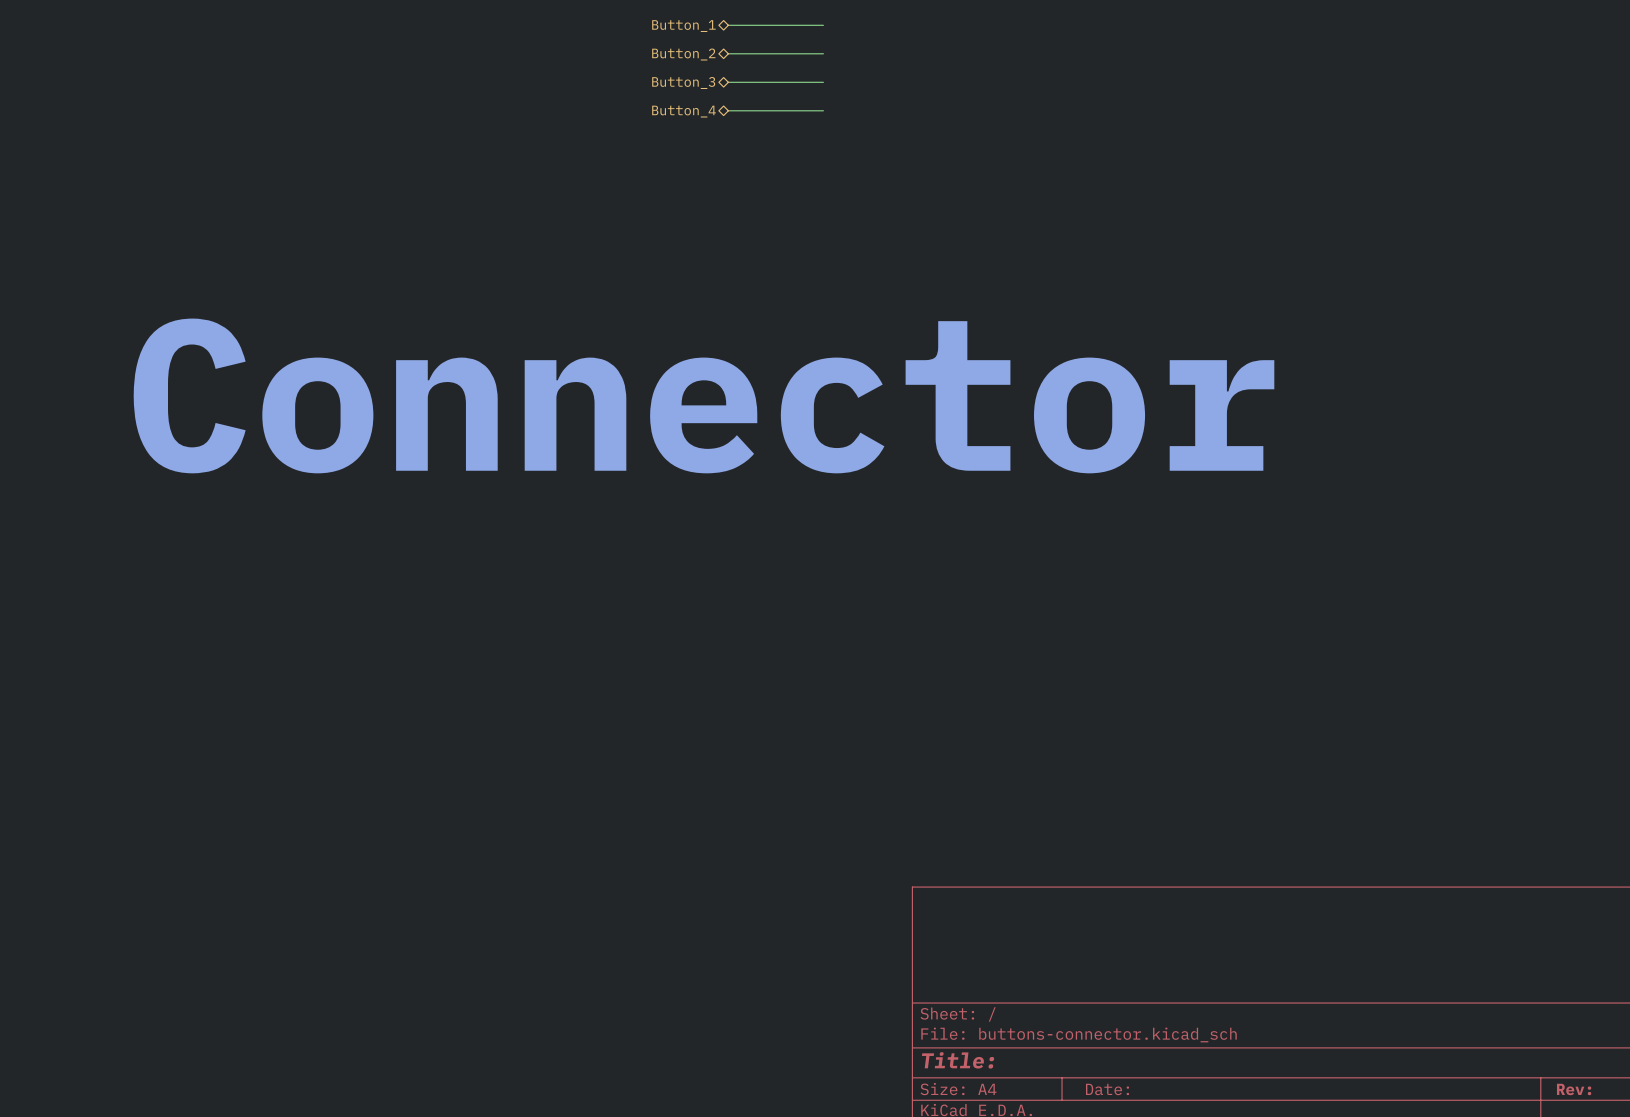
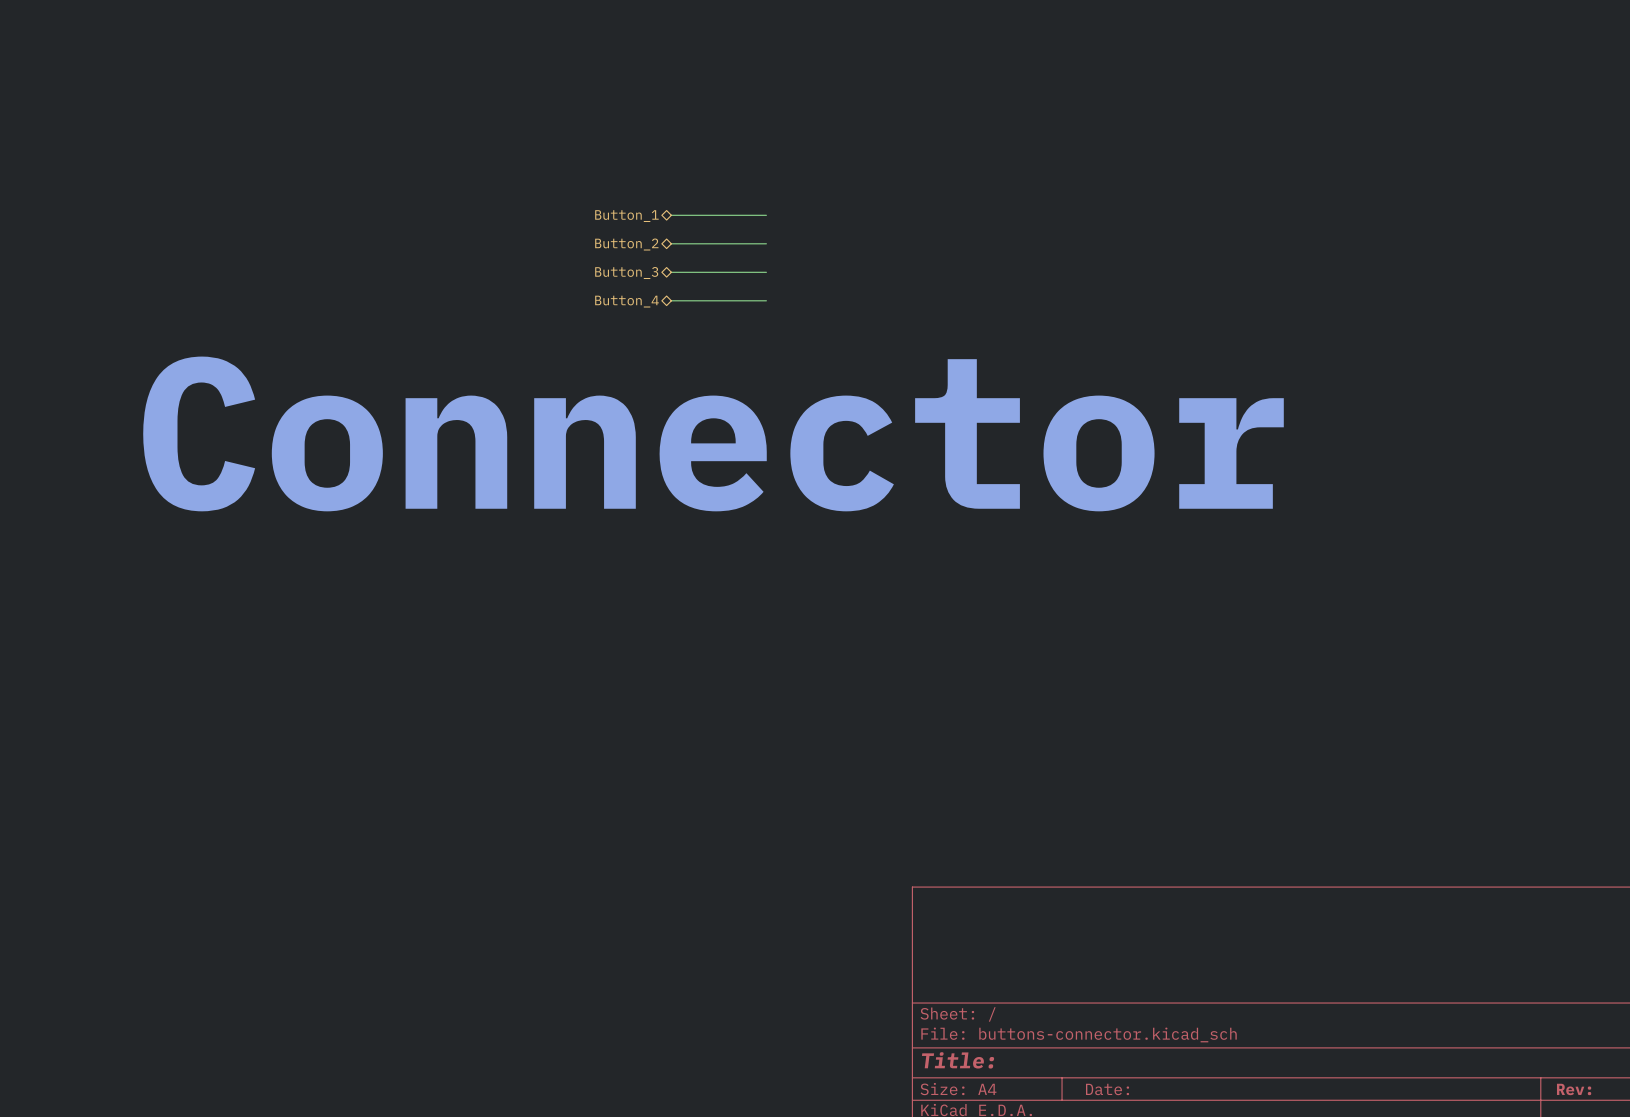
wire: (728, 25) (823, 25) -> none
hierarchical label: Button_1 (683, 26) -> none
wire: (728, 53) (823, 53) -> (671, 215) (766, 215)
hierarchical label: Button_2 (683, 54) -> none
wire: (728, 82) (823, 82) -> (671, 243) (766, 243)
hierarchical label: Button_3 (683, 83) -> none
wire: (728, 110) (823, 110) -> (671, 272) (766, 272)
hierarchical label: Button_4 (683, 111) -> none
hierarchical label: none -> Button_1 (626, 216)
hierarchical label: none -> Button_2 (626, 244)
hierarchical label: none -> Button_3 (626, 273)
wire: none -> (671, 300) (766, 300)
hierarchical label: none -> Button_4 (626, 301)
text position: Connector (704, 395) -> Connector (713, 433)

